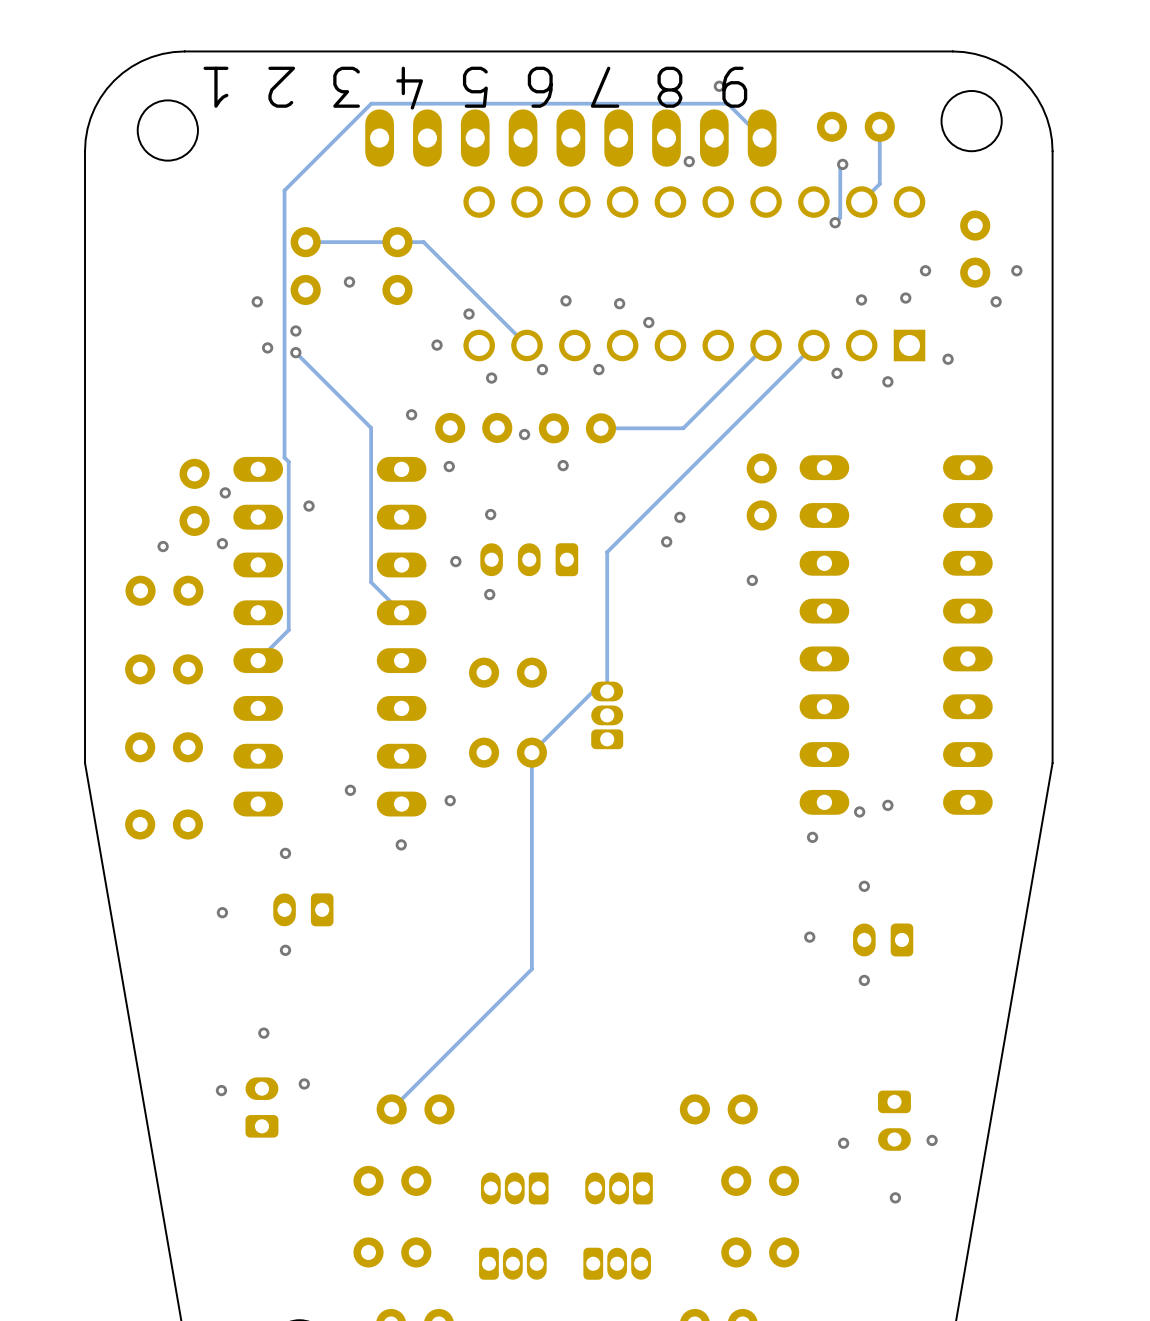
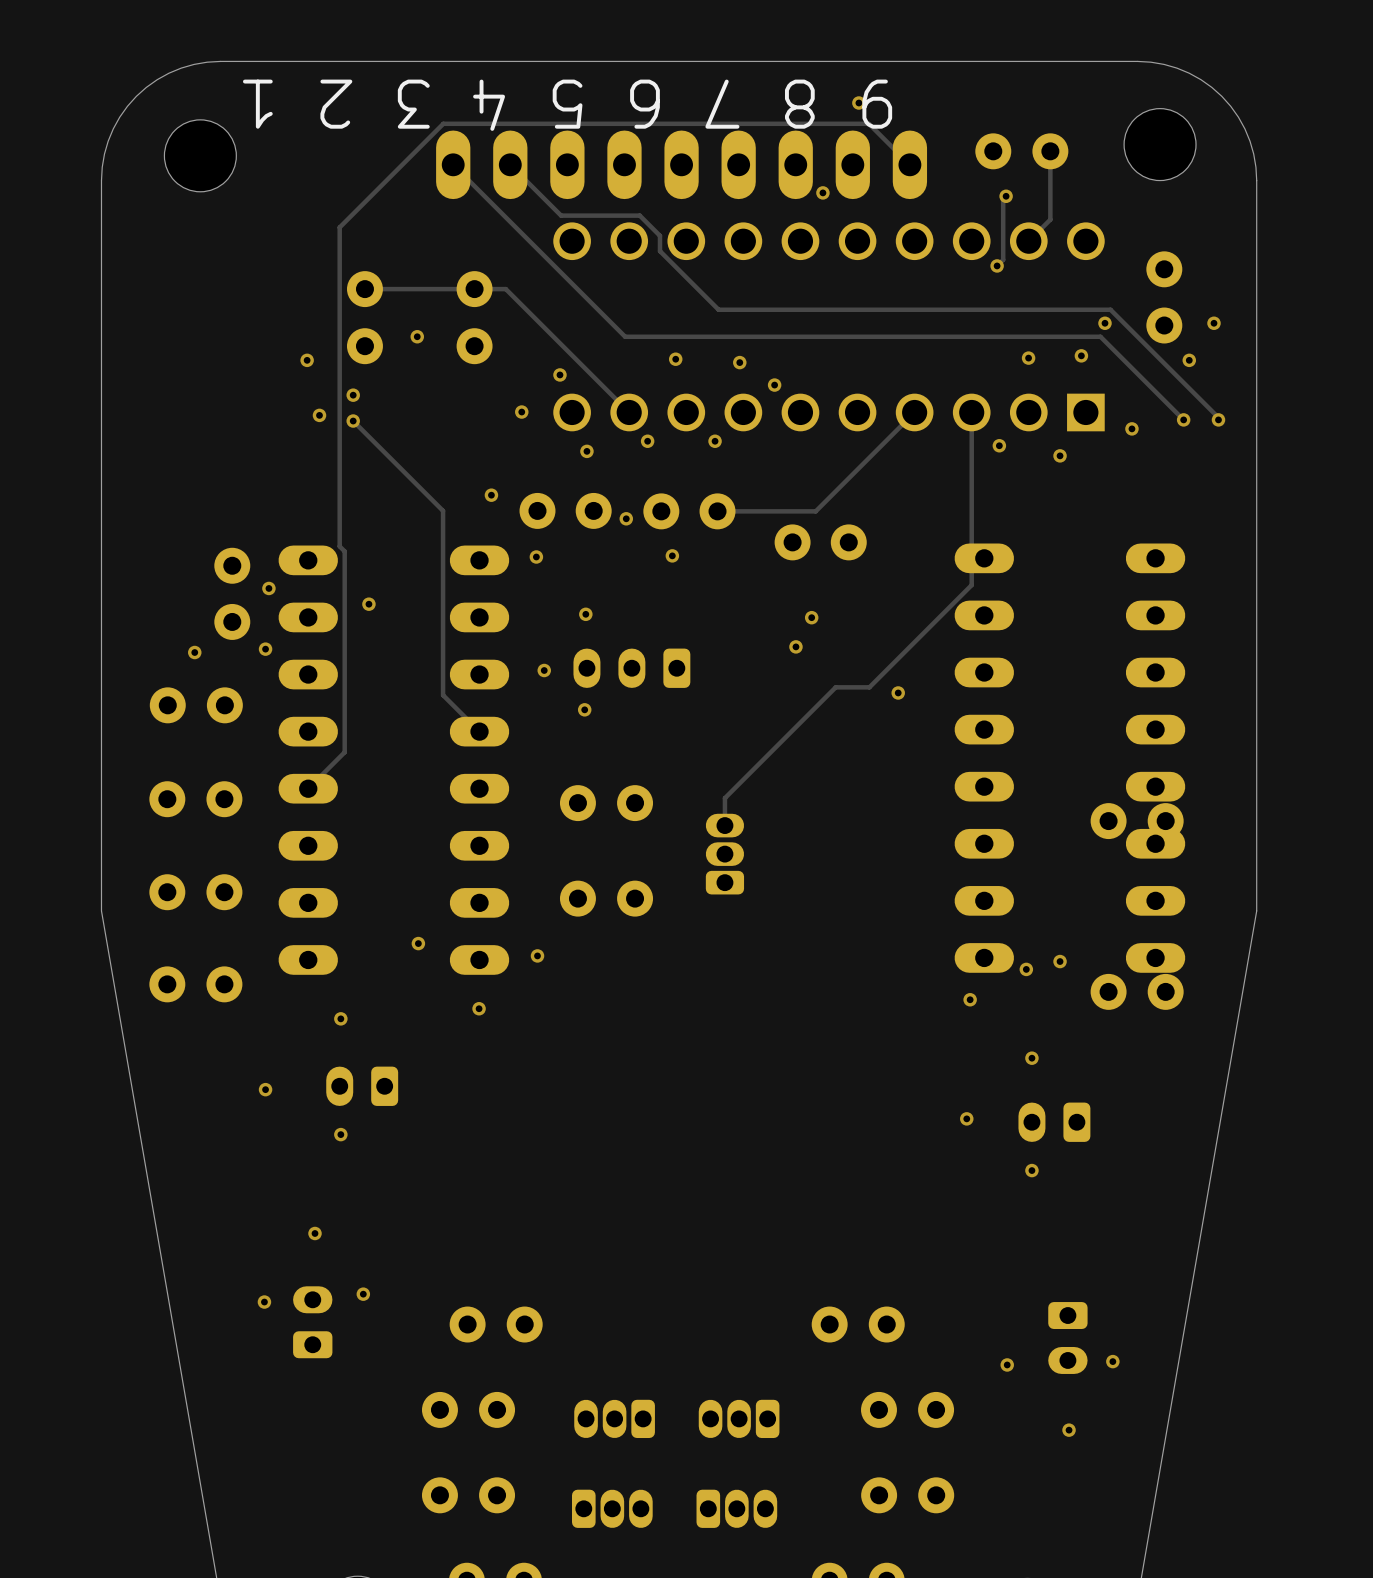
track: none -> (453, 164) (625, 336) (1100, 336) (1183, 419)
track: none -> (510, 164) (561, 215) (639, 215) (659, 235) (659, 251) (718, 309) (1110, 309) (1218, 417) (1218, 419)
track: (813, 345) (607, 552) (607, 668) -> (971, 412) (971, 585) (869, 687) (835, 687) (724, 798)
via: none -> (1183, 419)
via: none -> (1218, 419)
part rotation: 0° (761, 491) -> 90° clockwise (820, 542)
part position: (761, 491) -> (820, 542)
part: none -> (1137, 821)
track: (607, 691) (593, 691) (531, 752) (531, 969) (391, 1109) -> none
part: none -> (1137, 991)

